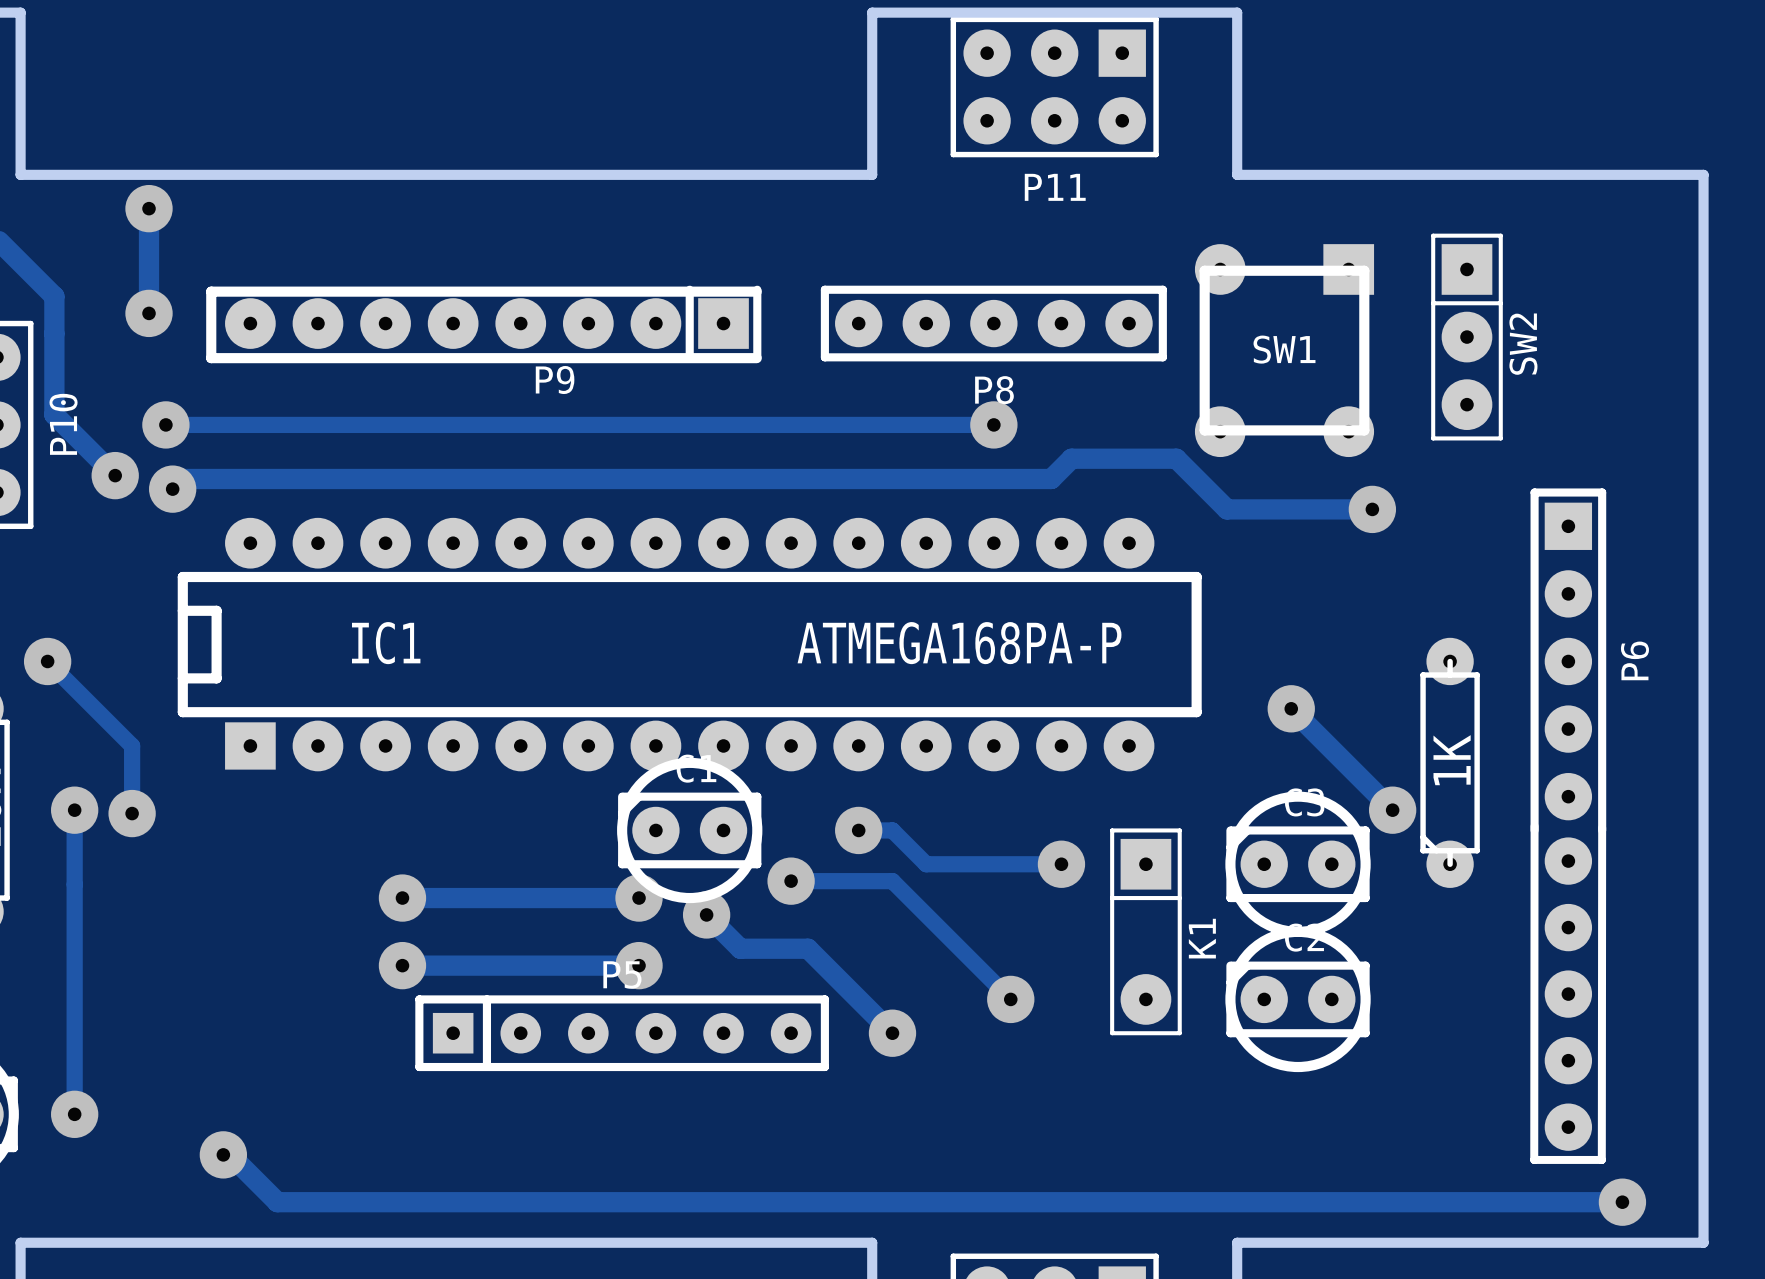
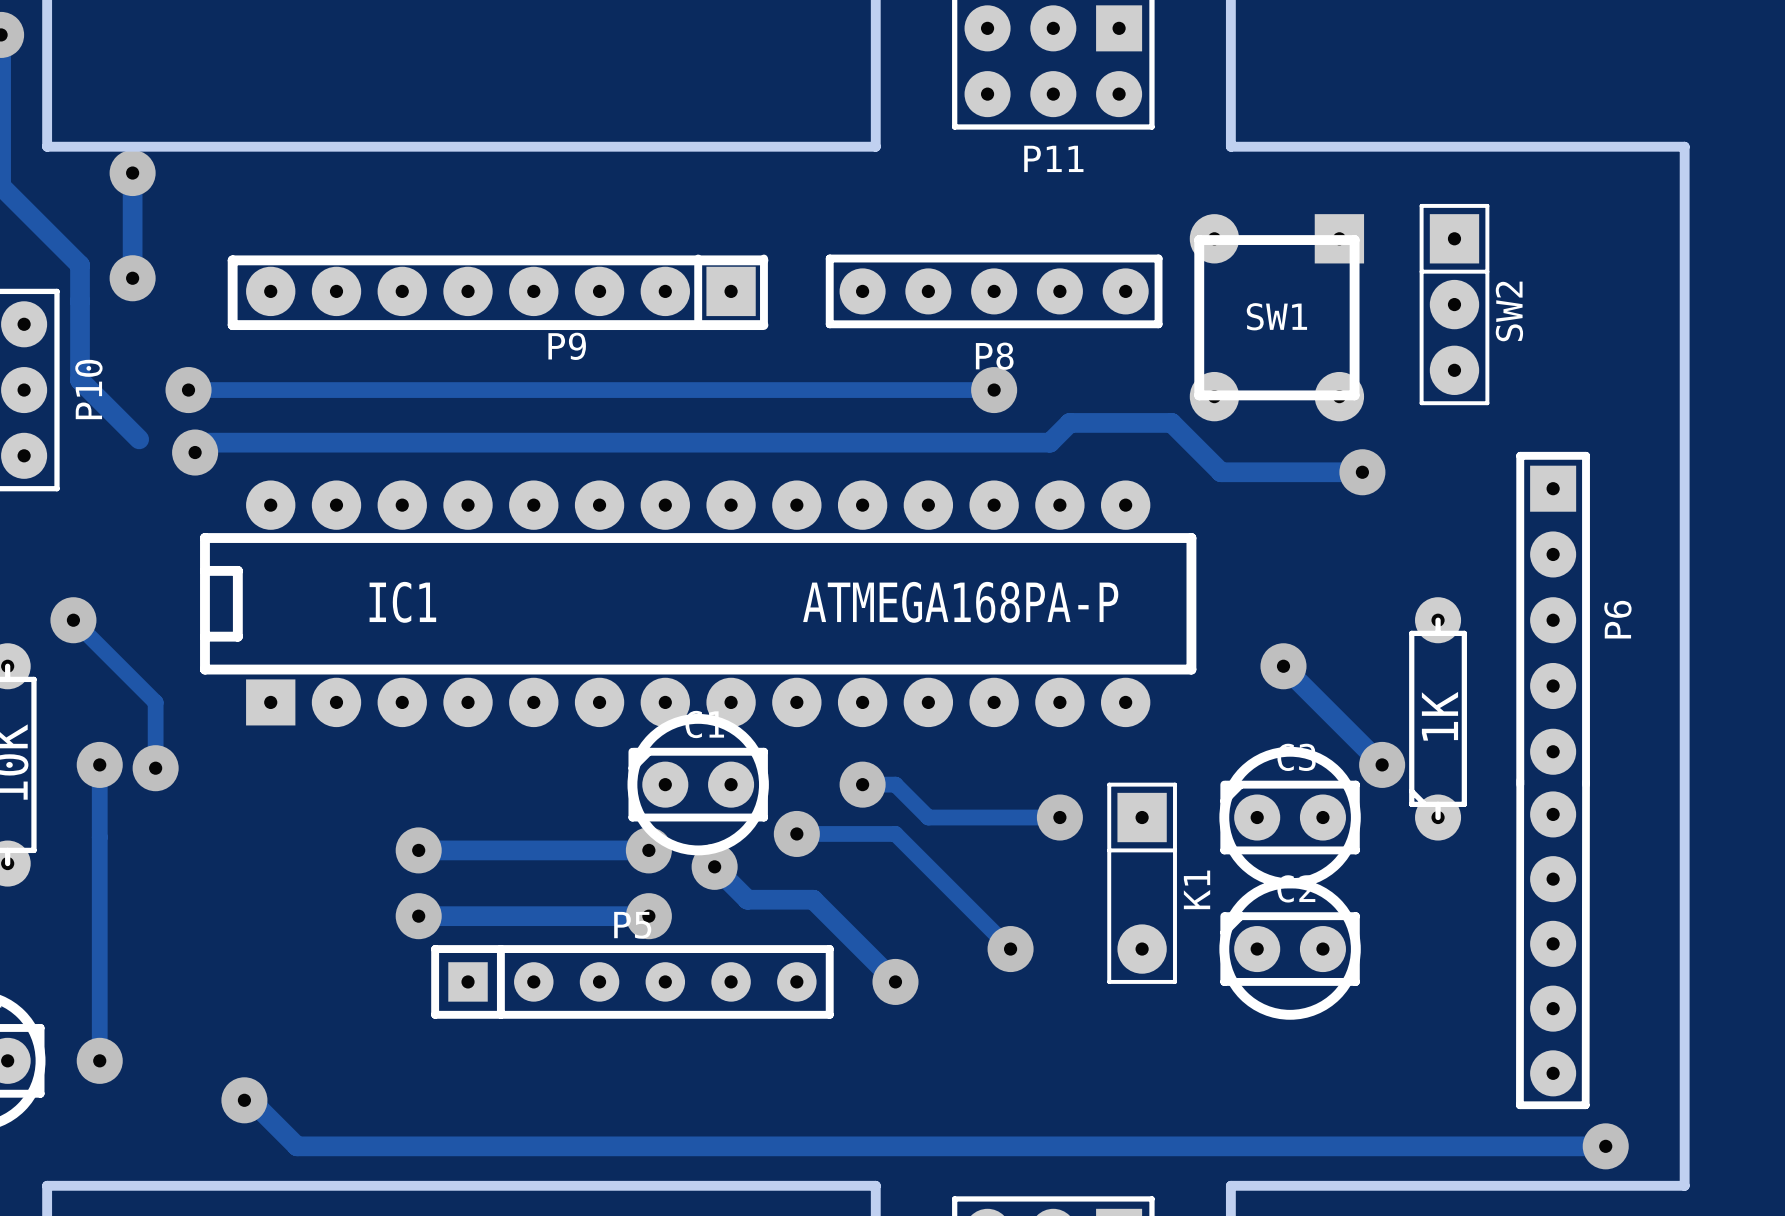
track: (149, 205) (149, 313) -> (132, 173) (132, 278)
via position: (149, 208) -> (132, 173)
via position: (149, 313) -> (132, 278)
via: (115, 475) -> none

